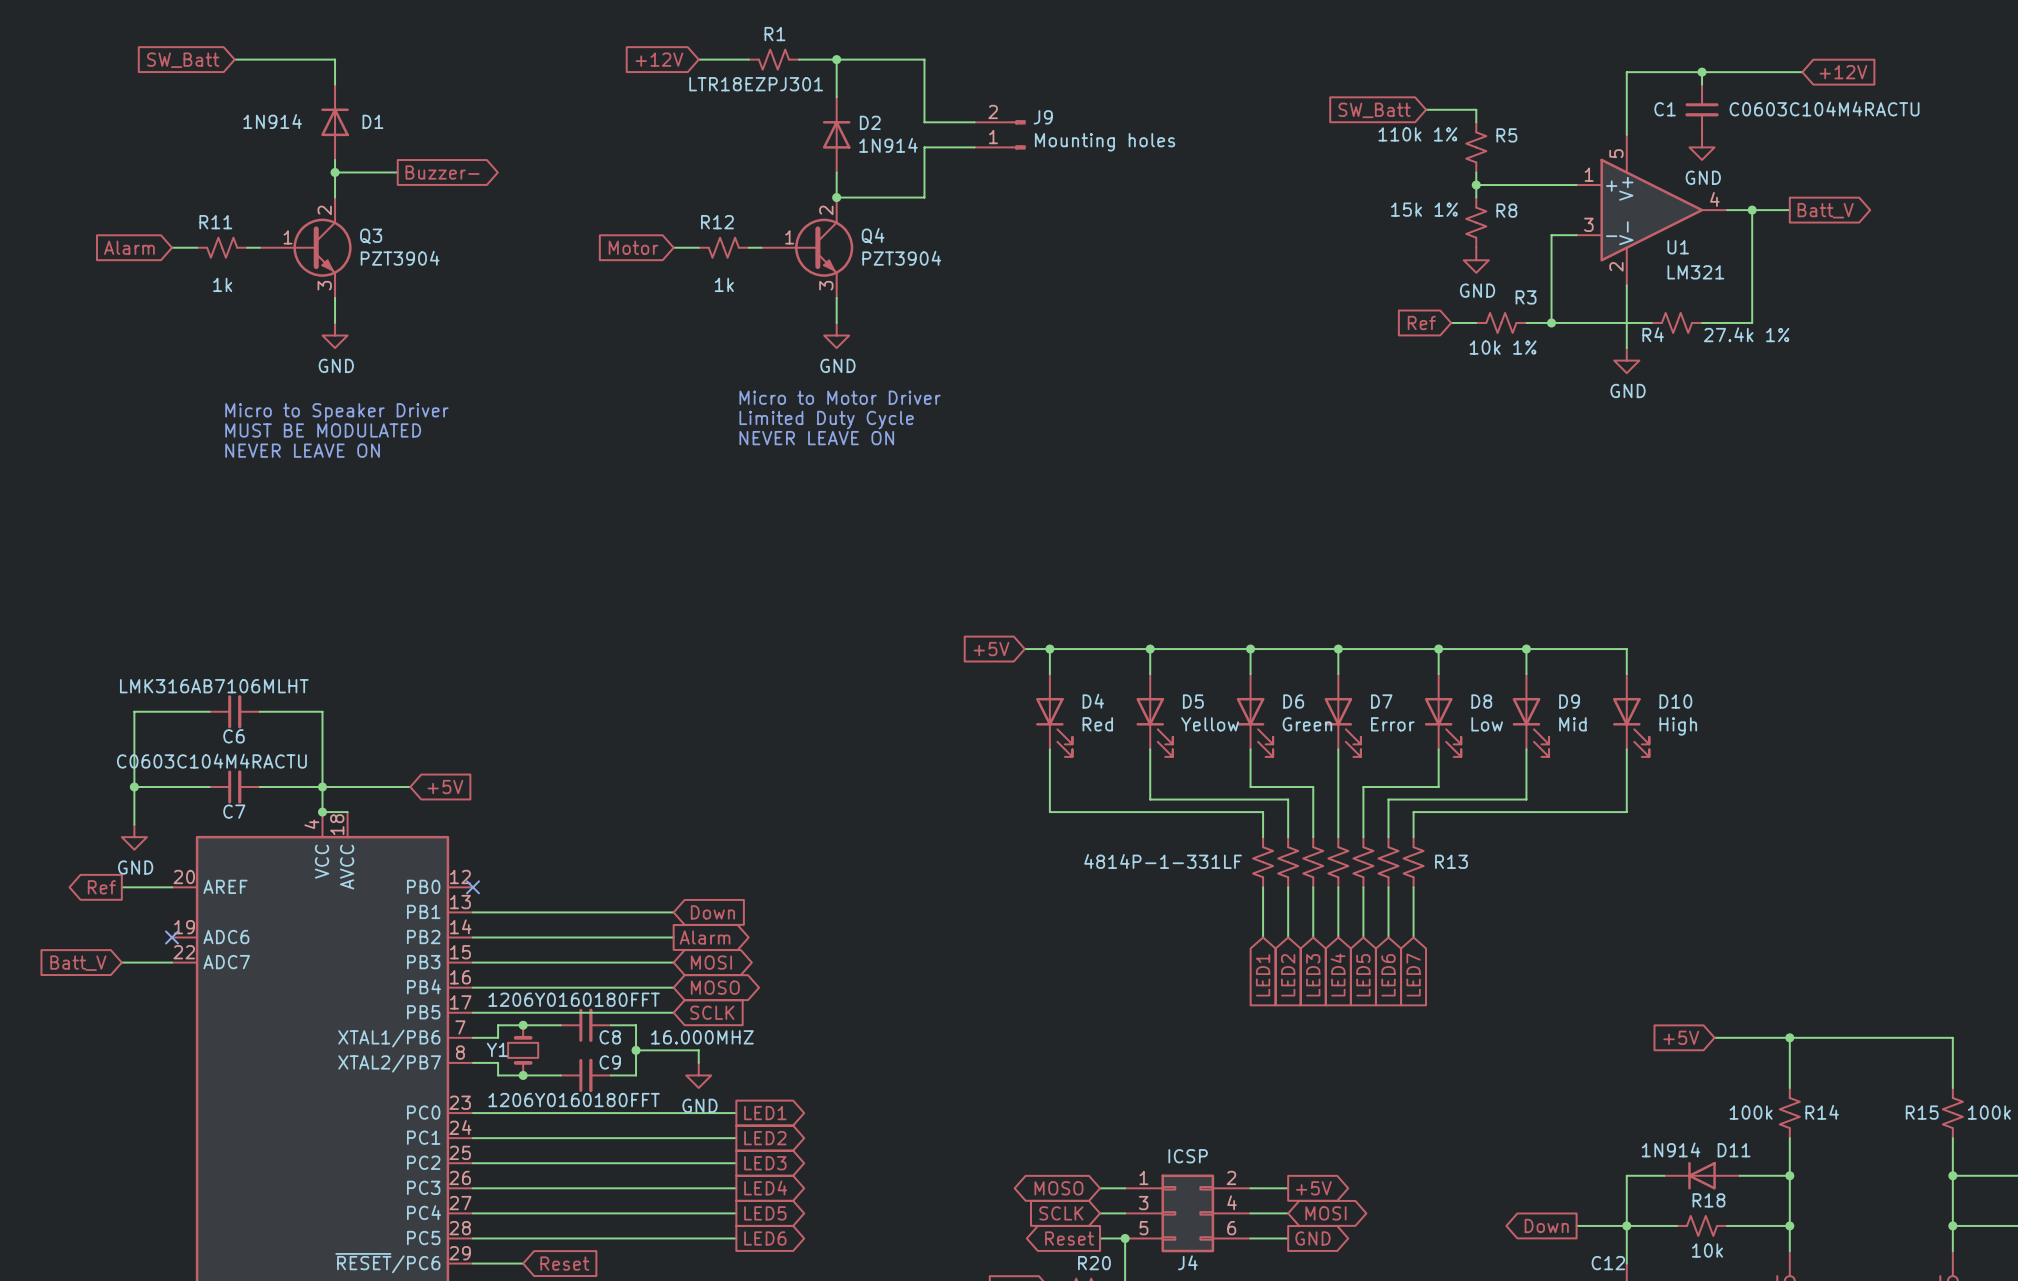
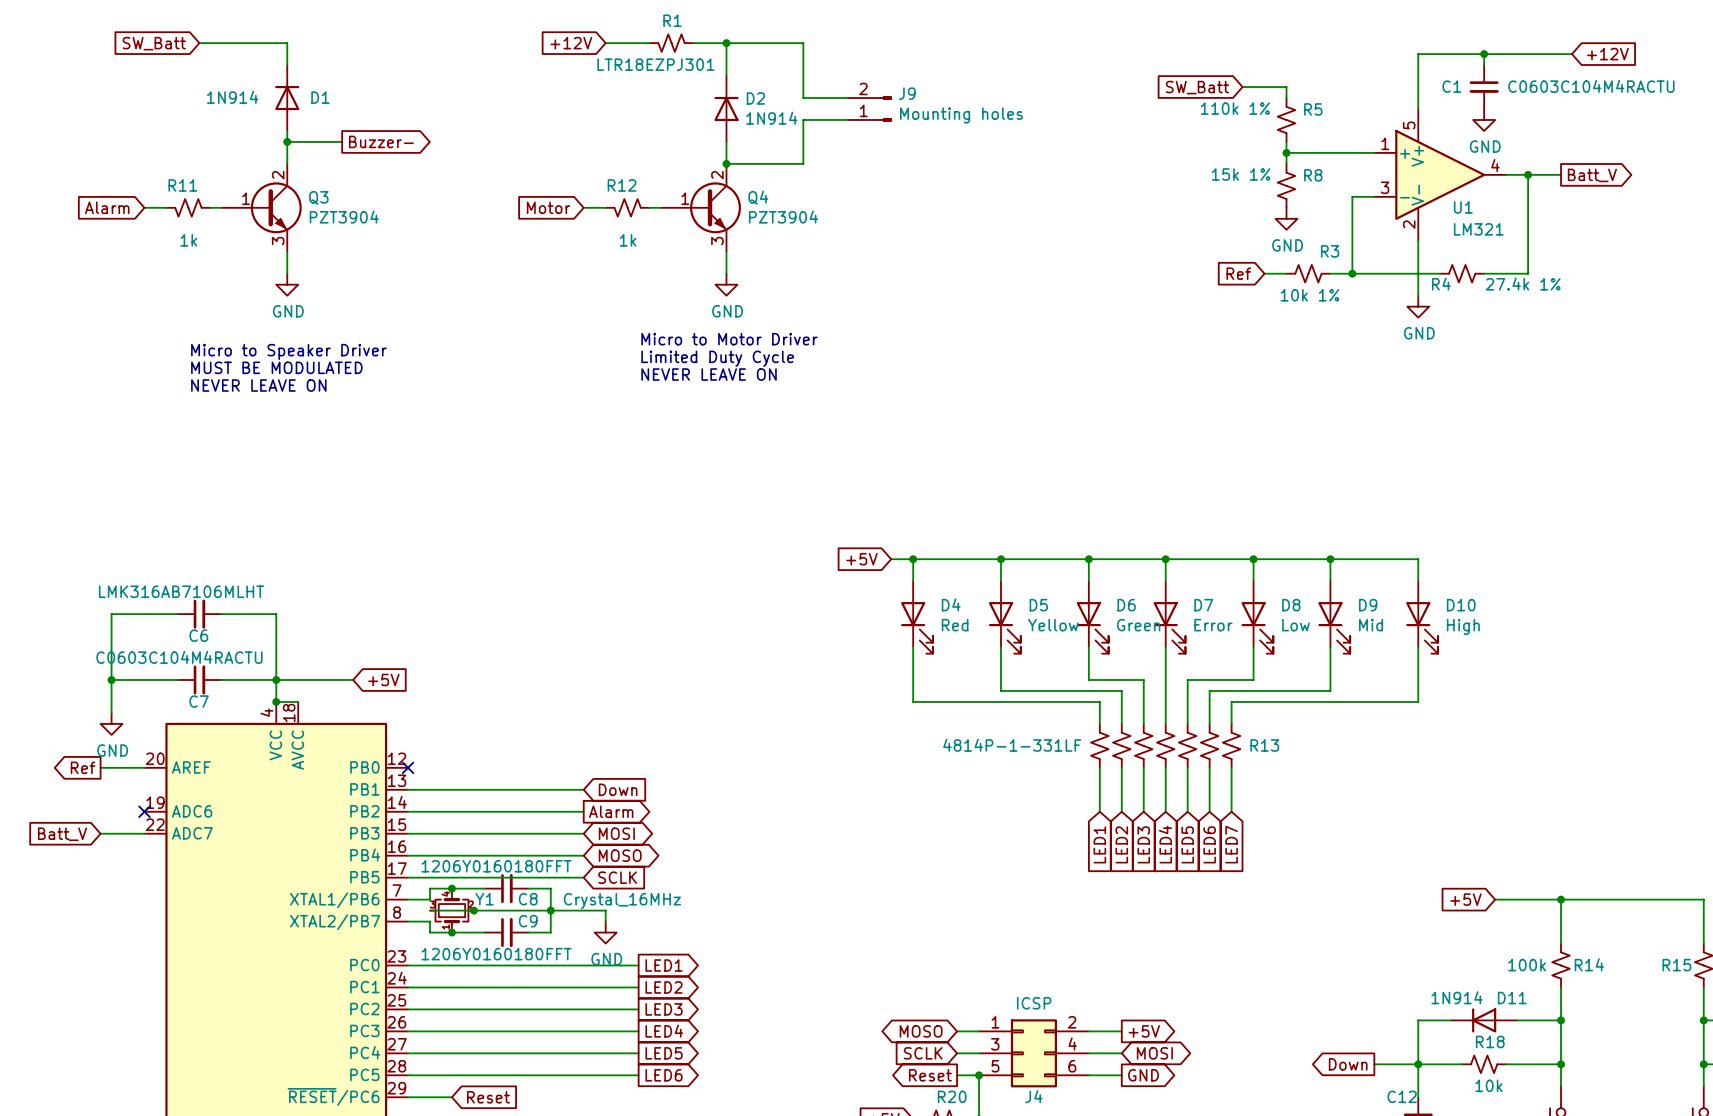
Y1 symbol: [508, 1025, 539, 1076] -> [430, 888, 474, 933]
Y1 value: 16.000MHZ (702, 1037) -> Crystal_16MHz (622, 901)
Y1 name position: Y1 (497, 1049) -> Y1 (484, 899)
wire: none -> (430, 910) (550, 910)
junction: none -> (473, 910)

